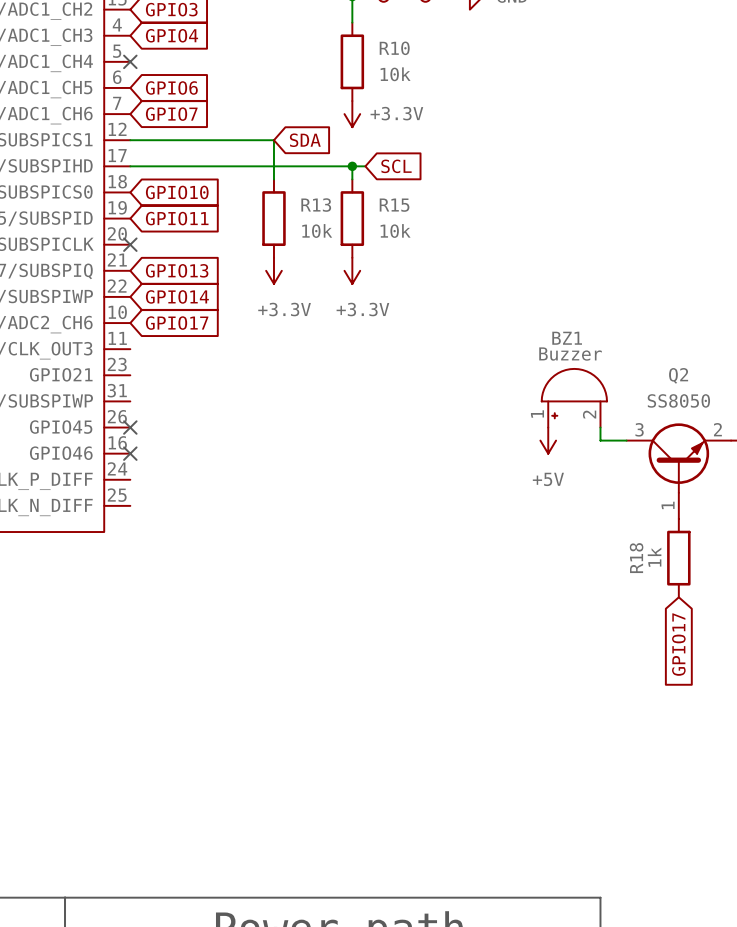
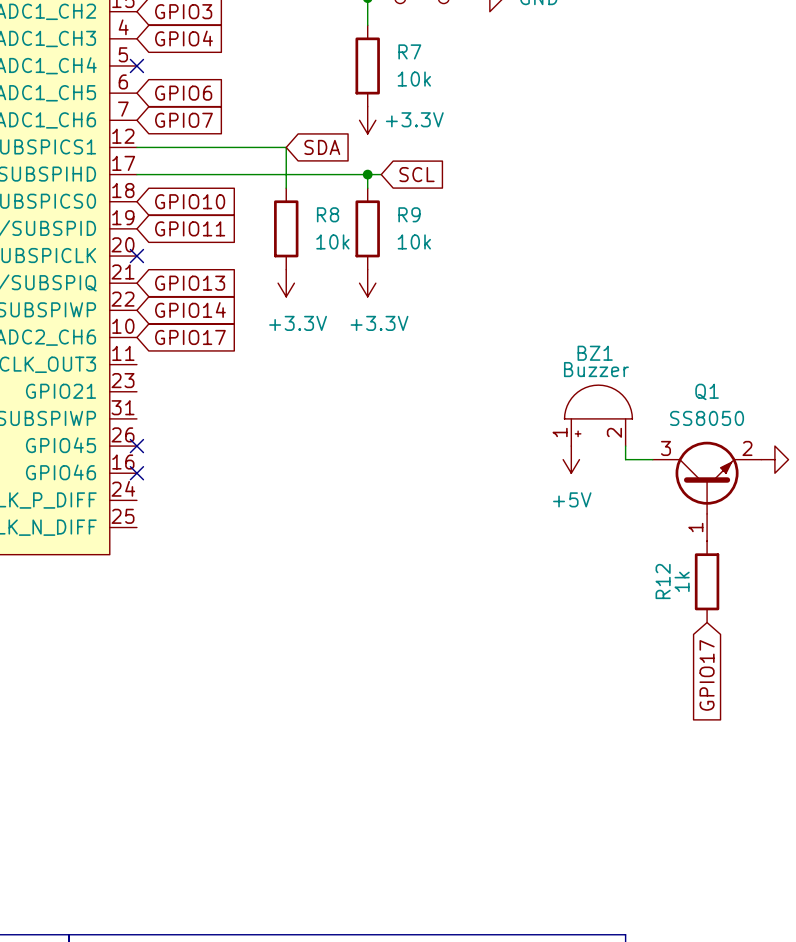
R10 name: R10 (394, 48) -> R7 (409, 51)
R13 name: R13 (316, 205) -> R8 (328, 214)
R15 name: R15 (394, 205) -> R9 (409, 214)
Q2 name: Q2 (678, 375) -> Q1 (707, 391)
R18 name: R18 (636, 558) -> R12 (663, 581)

